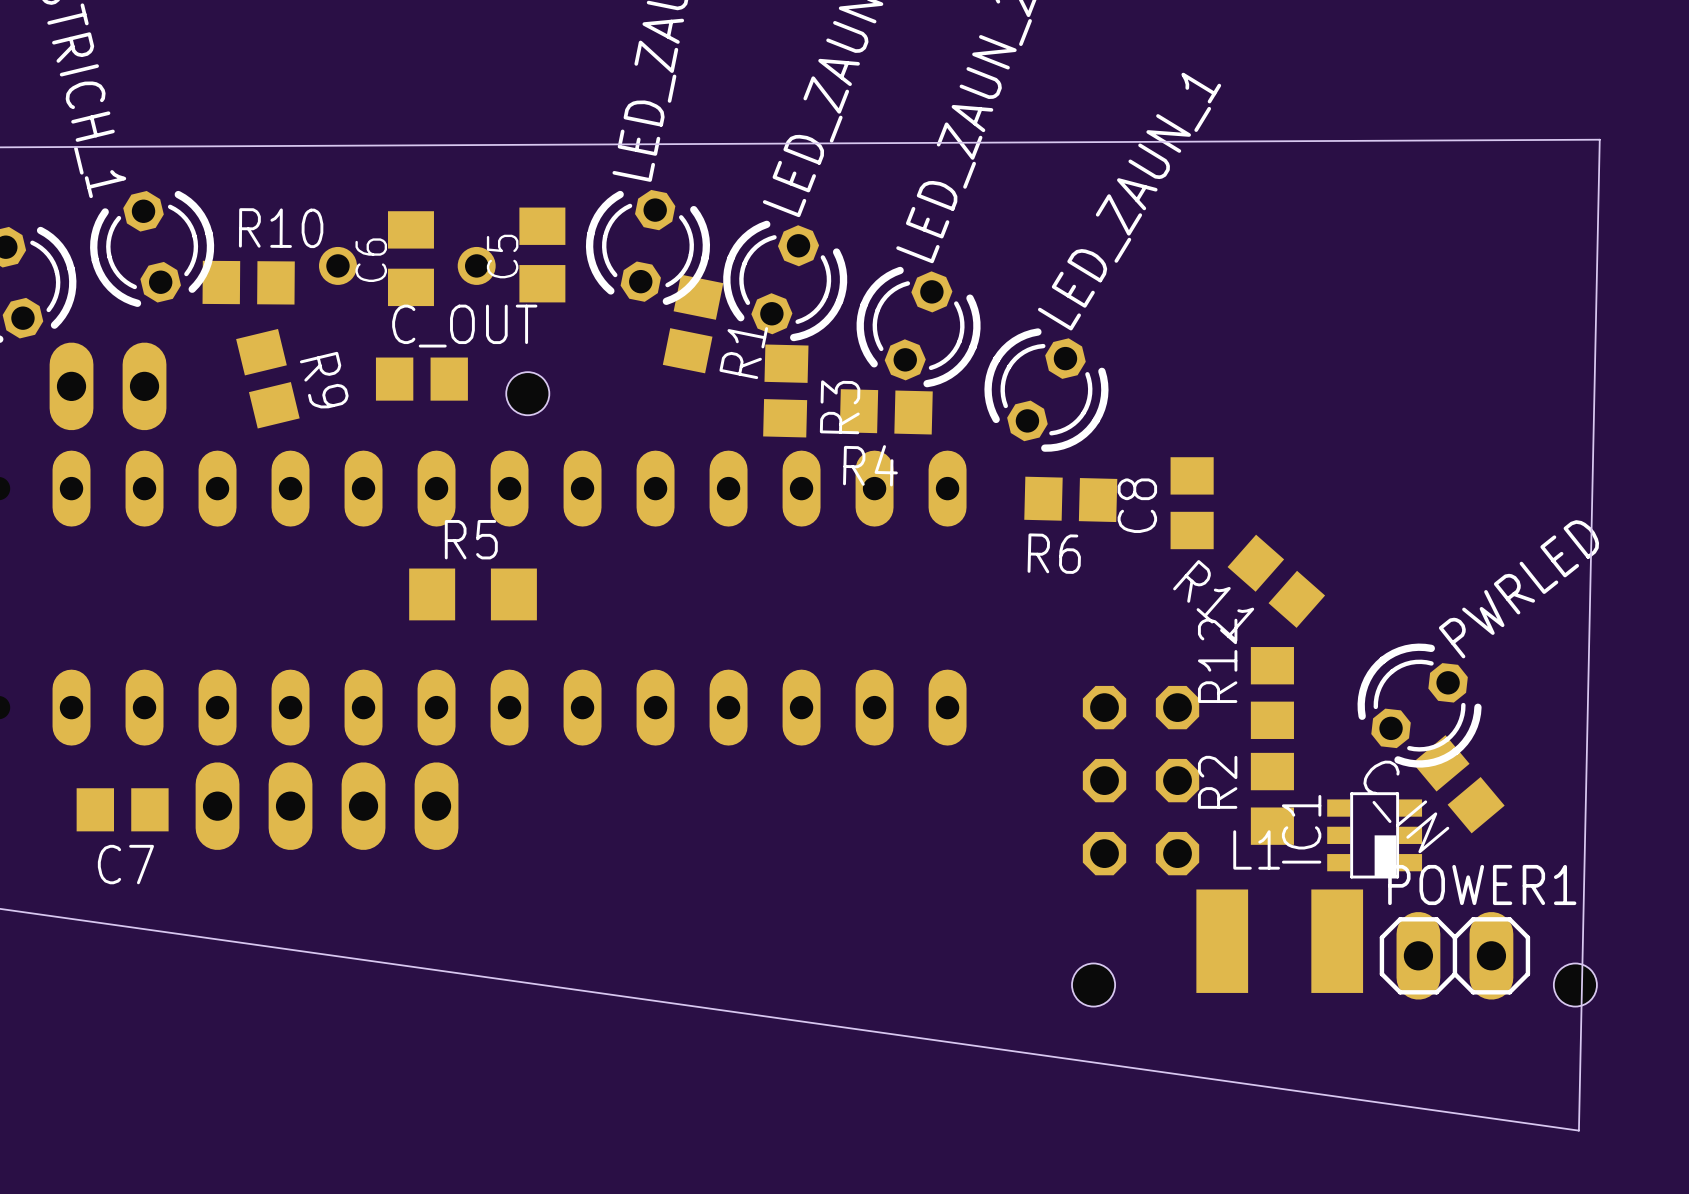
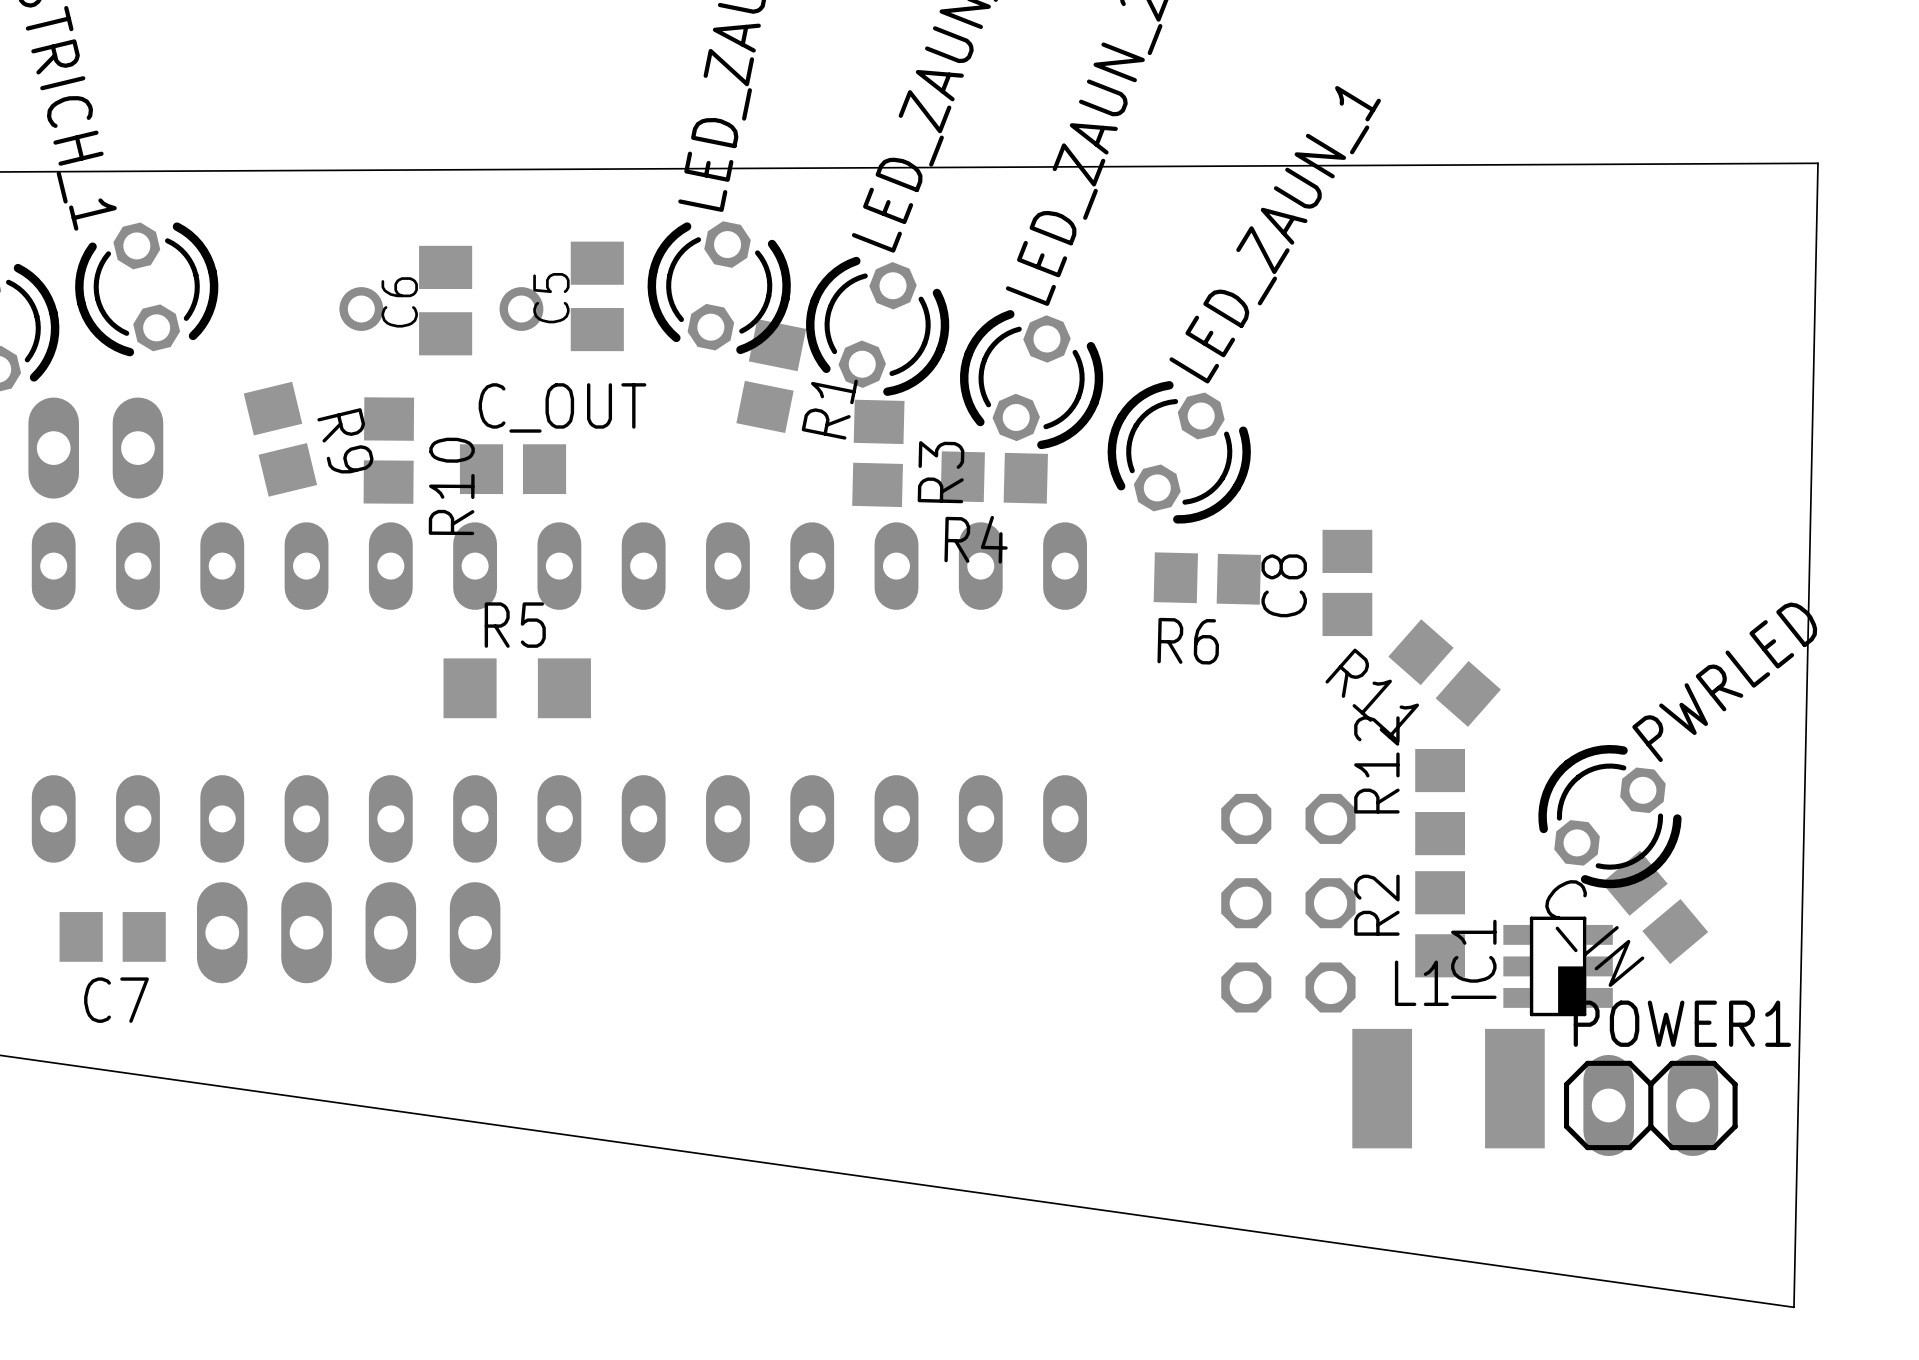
R10 rotation: 0° (248, 282) -> 90° clockwise (388, 450)
R10 position: (248, 282) -> (388, 450)
C_OUT position: (421, 379) -> (513, 469)
hole: (527, 393) -> none
hole: (1093, 985) -> none
hole: (1575, 985) -> none

